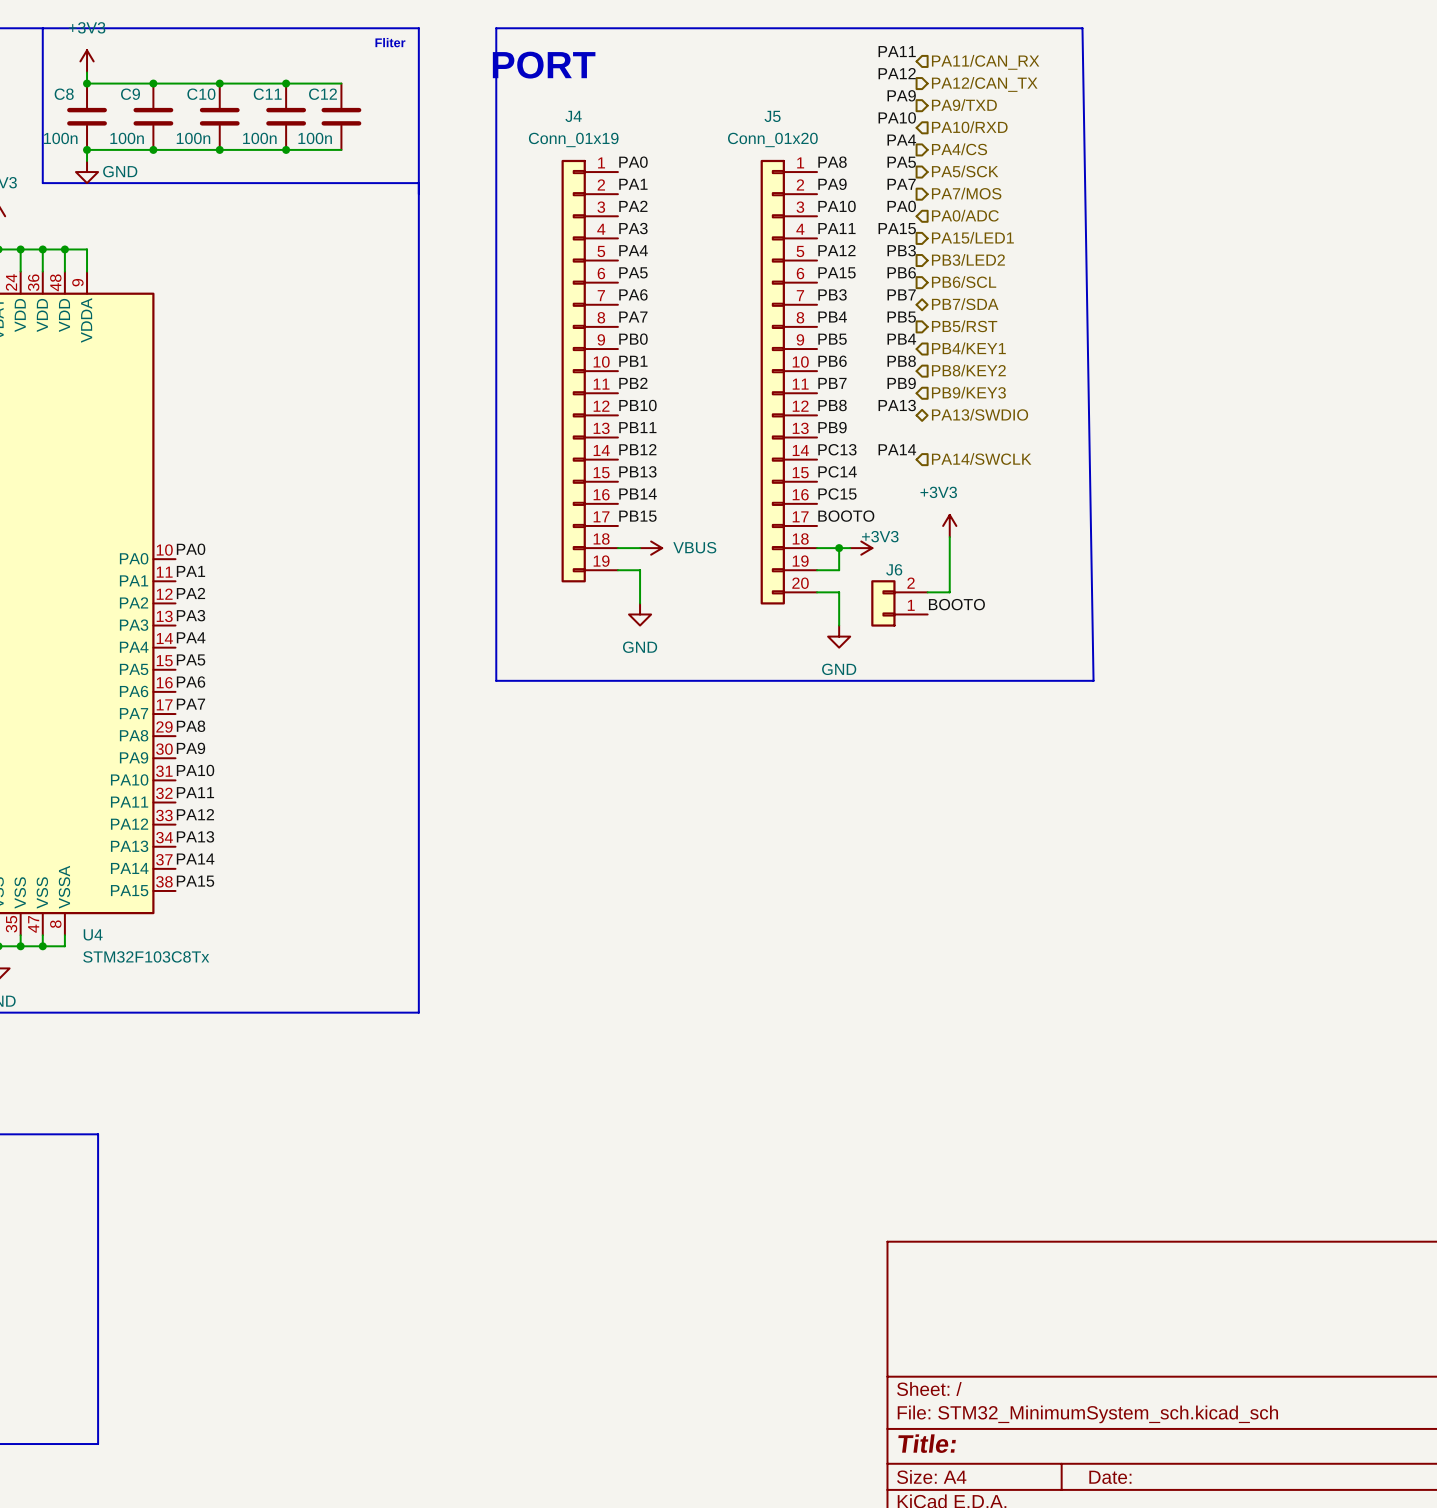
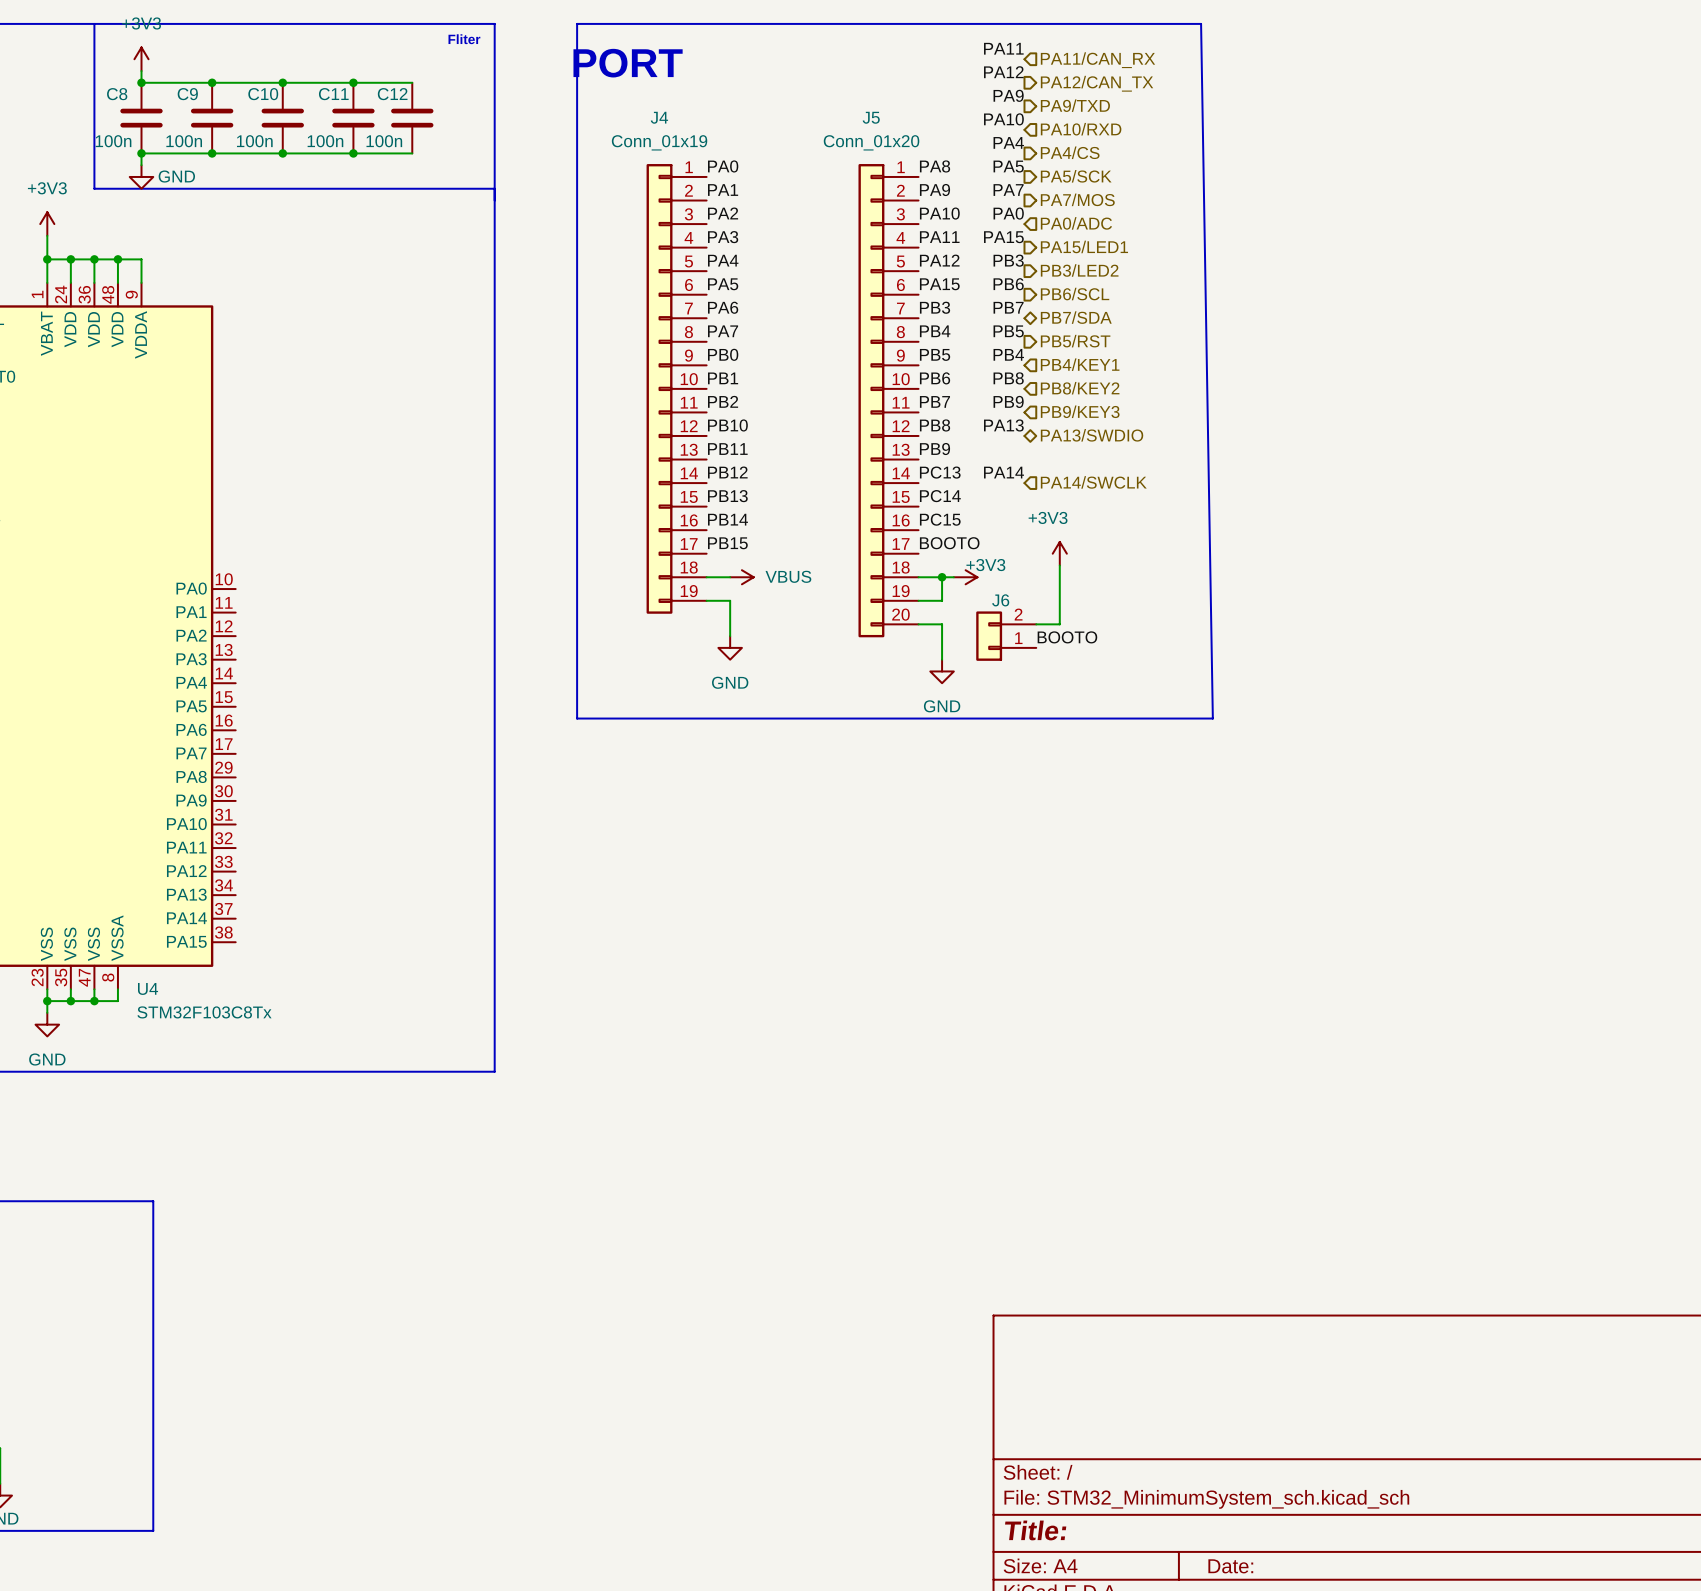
label: PA0 (191, 549) -> none
label: PA1 (190, 571) -> none
label: PA2 (190, 593) -> none
label: PA3 (191, 615) -> none
label: PA4 (191, 637) -> none
label: PA5 (191, 659) -> none
label: PA6 (191, 682) -> none
label: PA7 (190, 704) -> none
label: PA8 (191, 726) -> none
label: PA9 (190, 748) -> none
label: PA10 (195, 770) -> none
label: PA11 (195, 792) -> none
label: PA12 (195, 814) -> none
label: PA13 (195, 836) -> none
label: PA14 (195, 858) -> none
label: PA15 (195, 881) -> none

